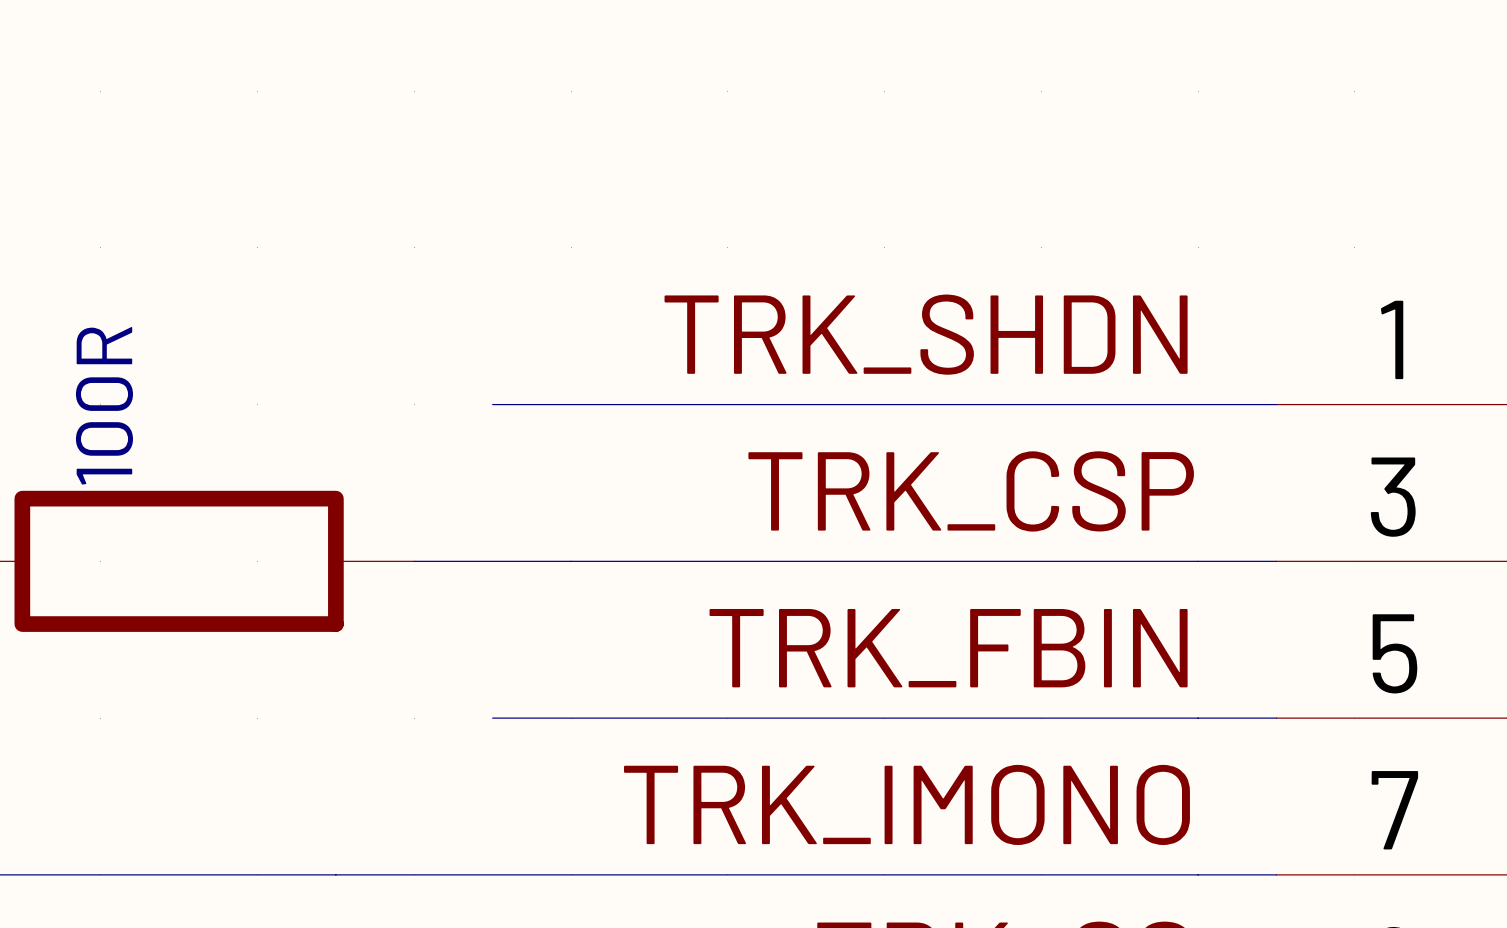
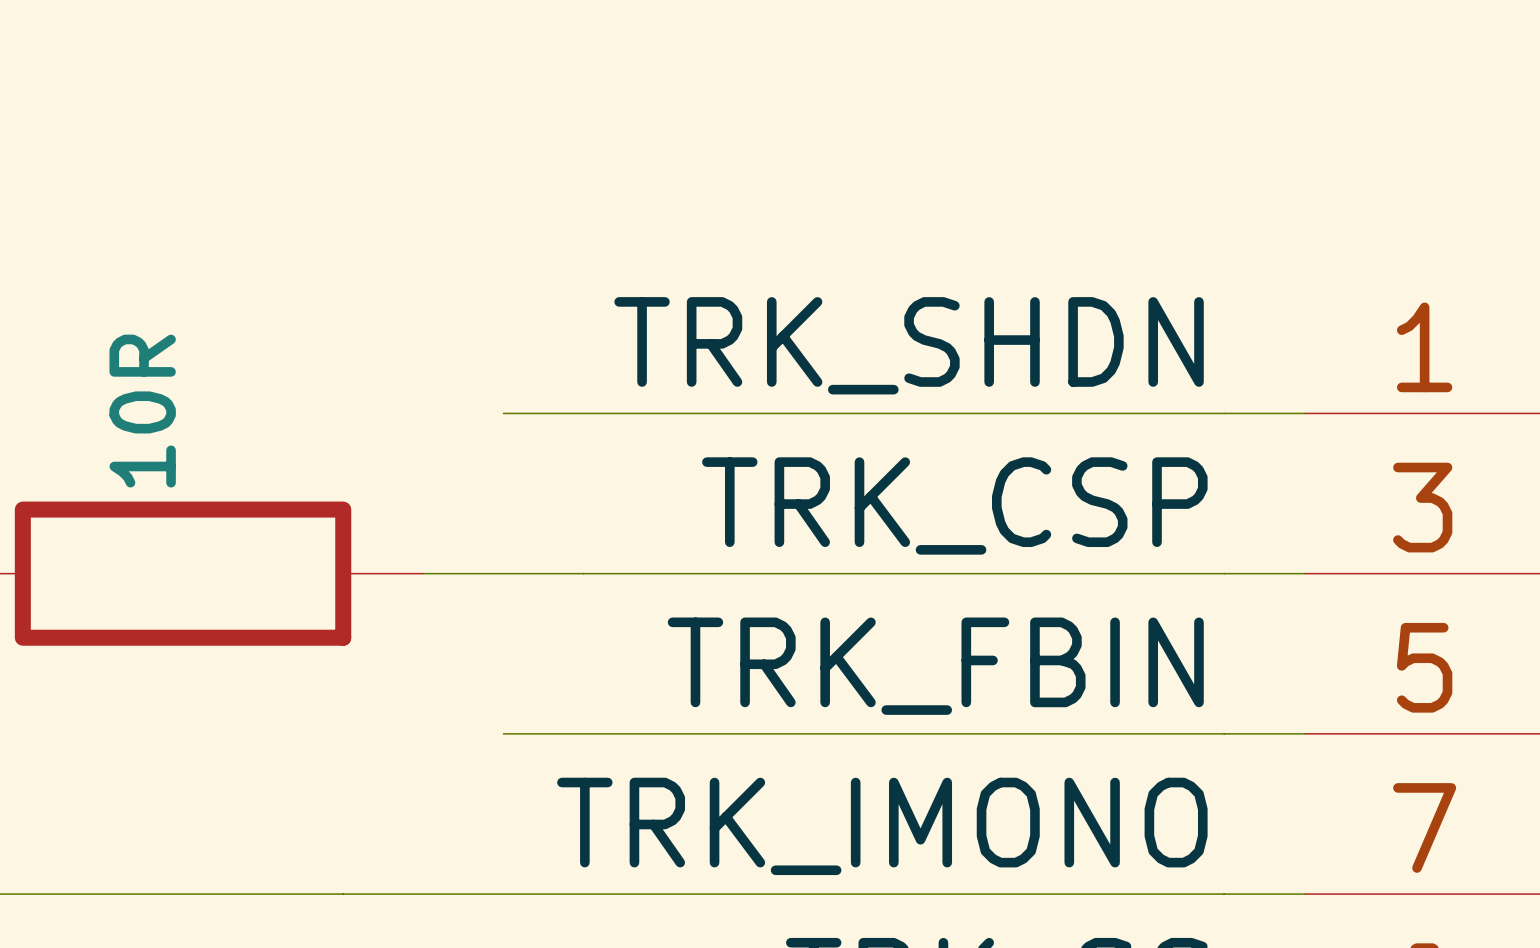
part value: 100R (104, 405) -> 10R (142, 411)

